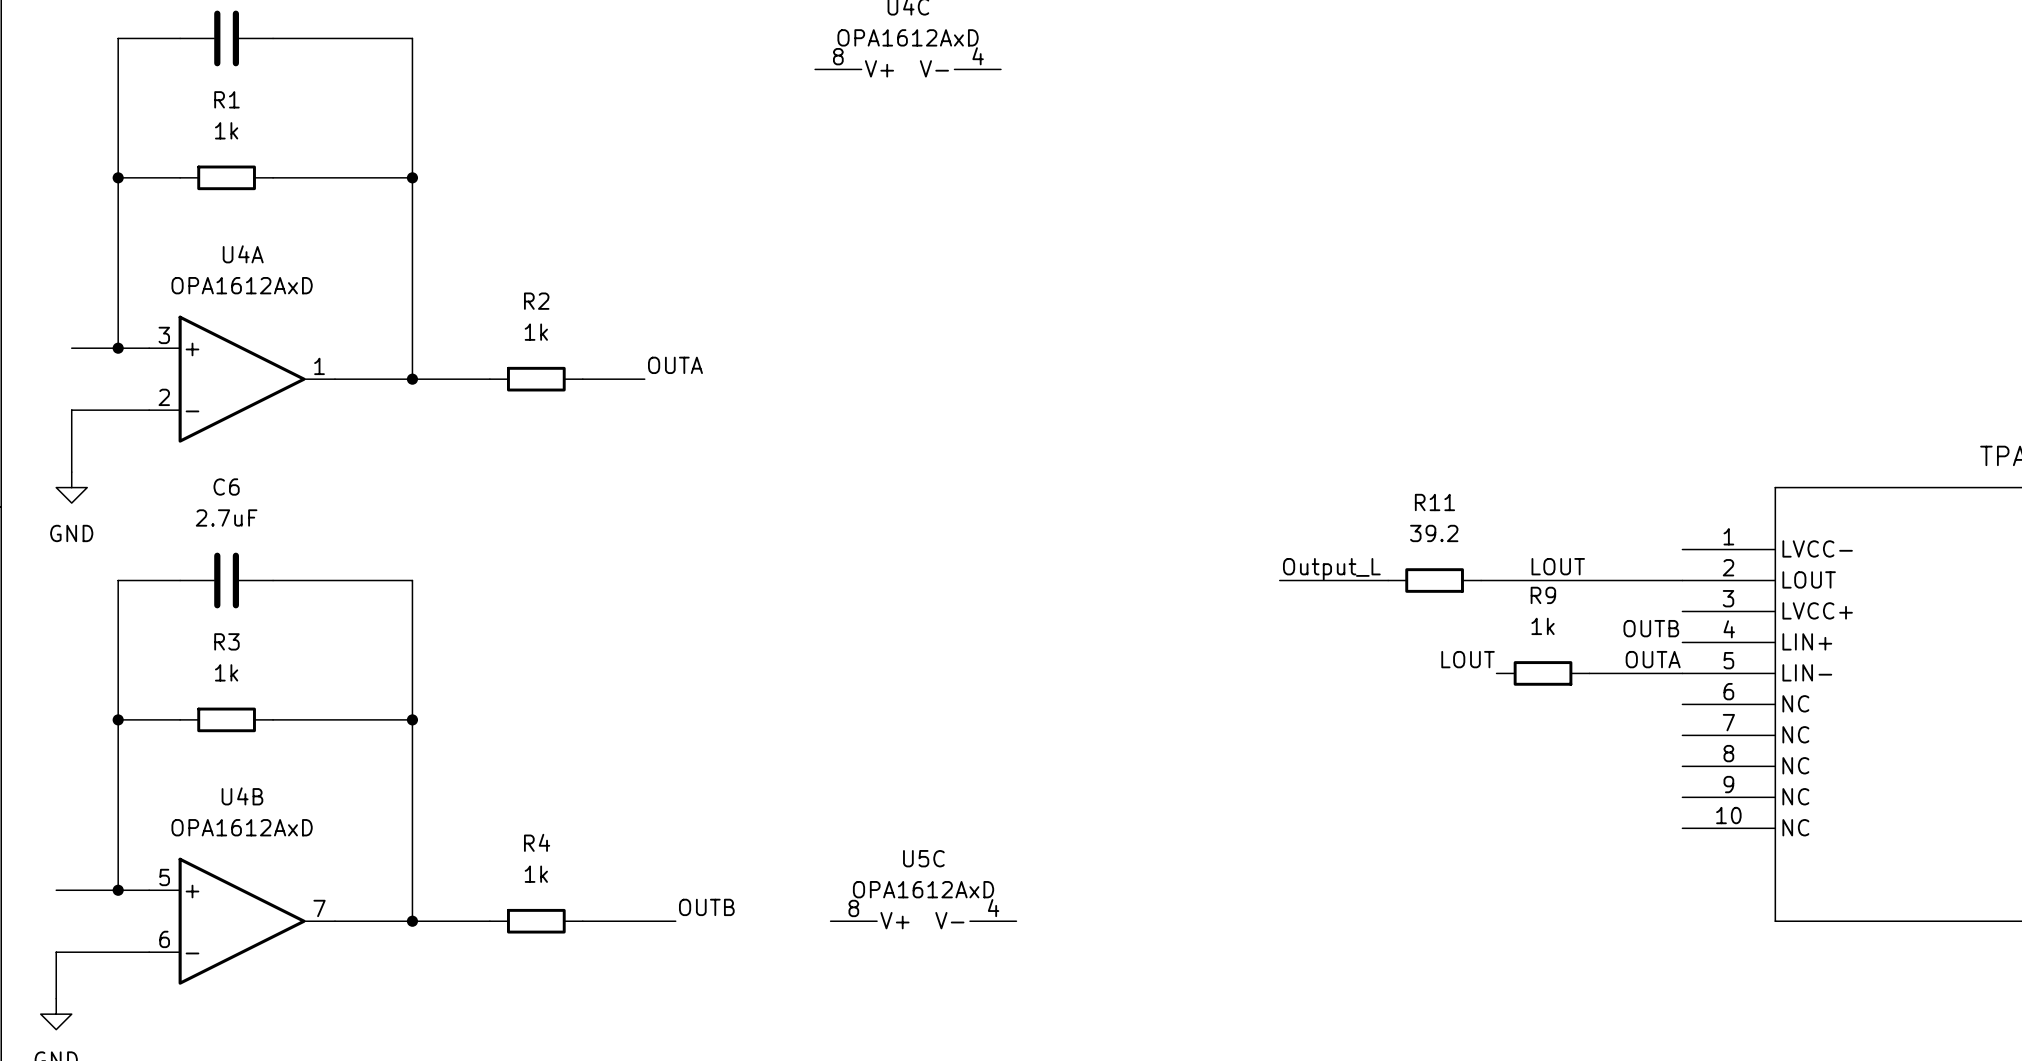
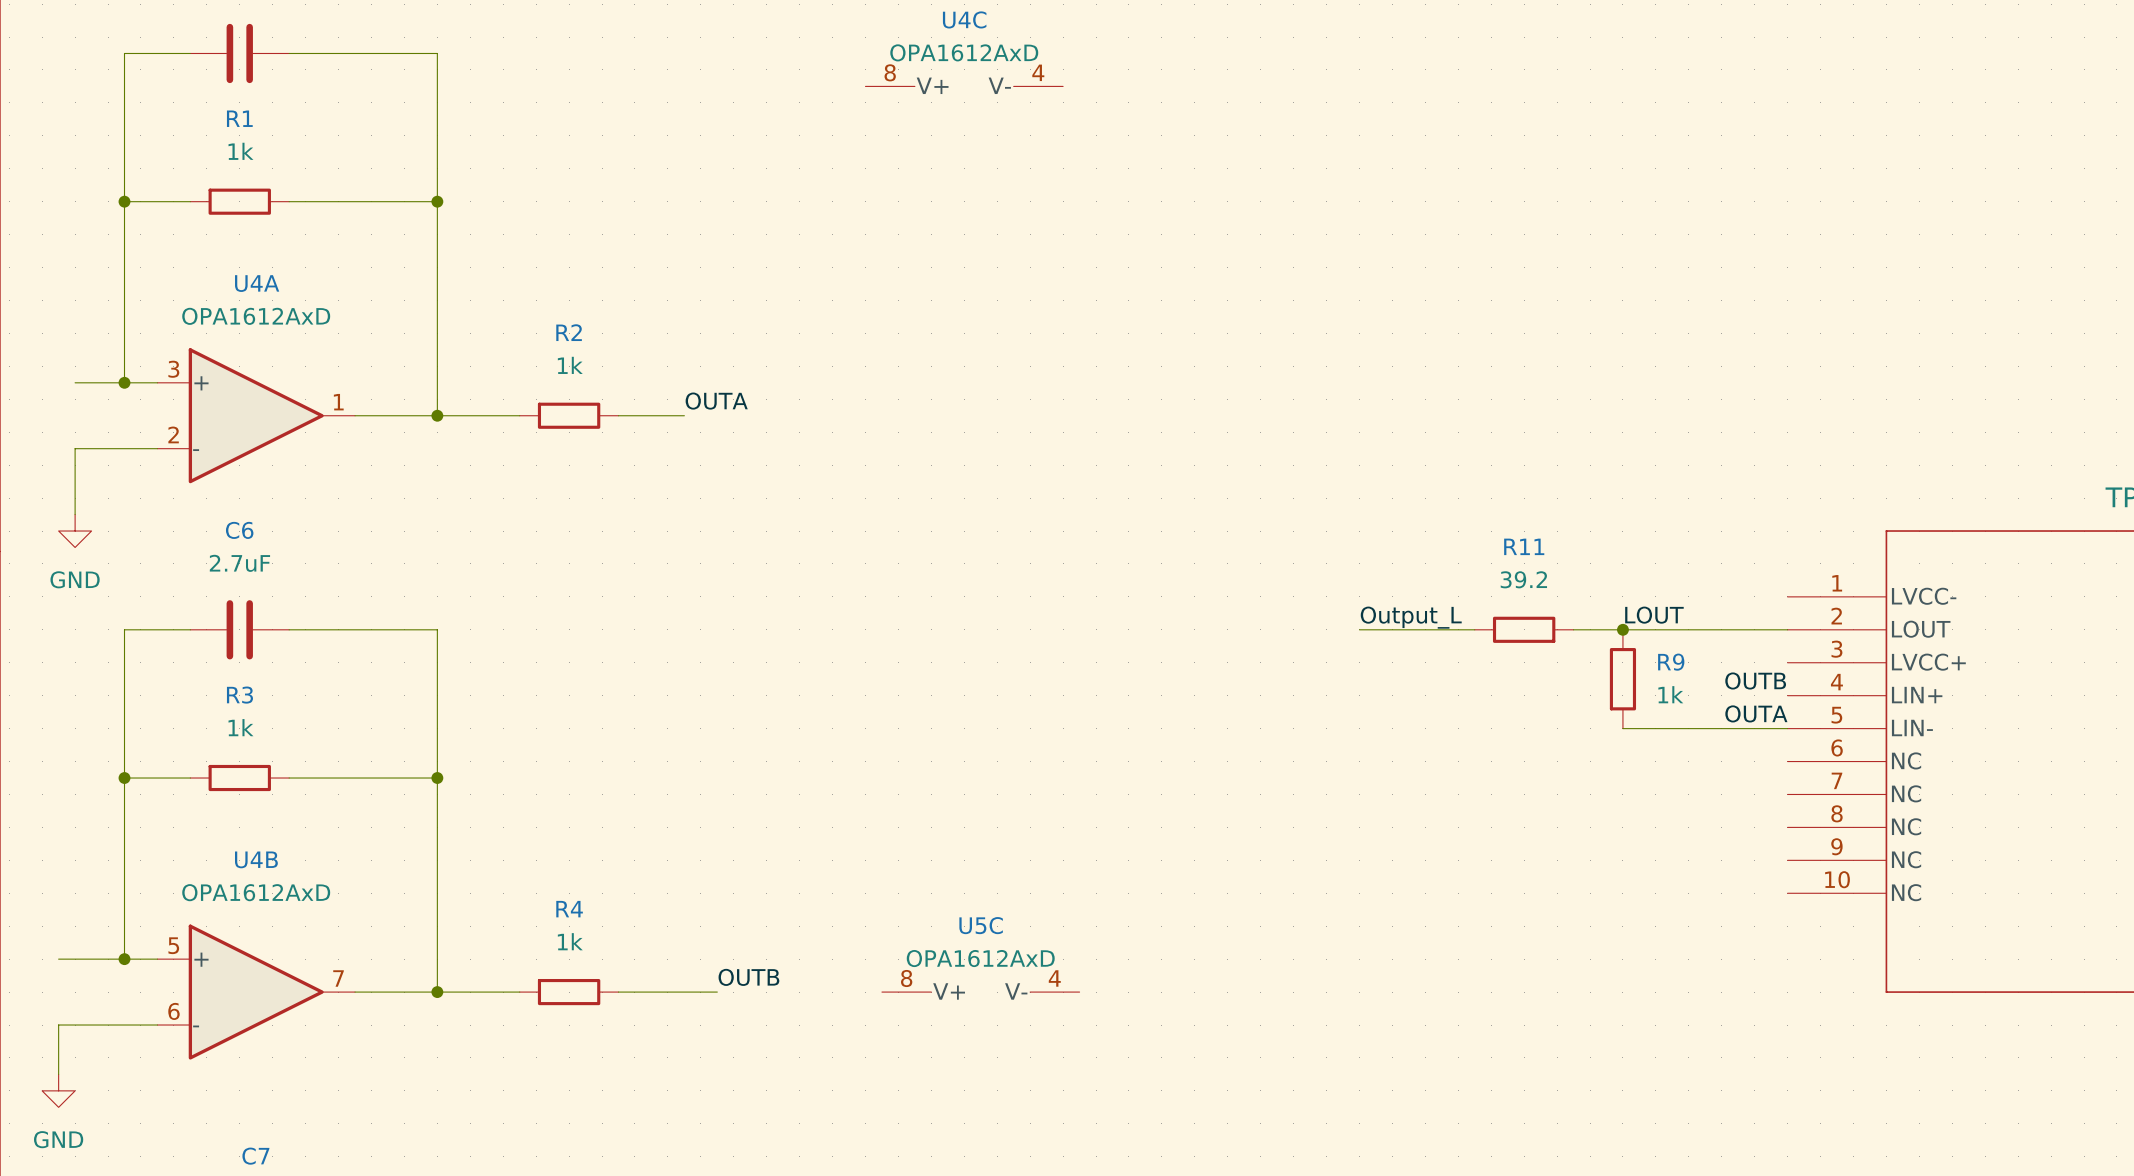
junction: none -> (1622, 629)
R9 name position: R9 (1543, 595) -> R9 (1671, 662)
label: LOUT (1468, 659) -> none
wire: none -> (1622, 728) (1688, 728)
R9 rotation: 0° (1543, 673) -> 90° clockwise (1622, 679)

